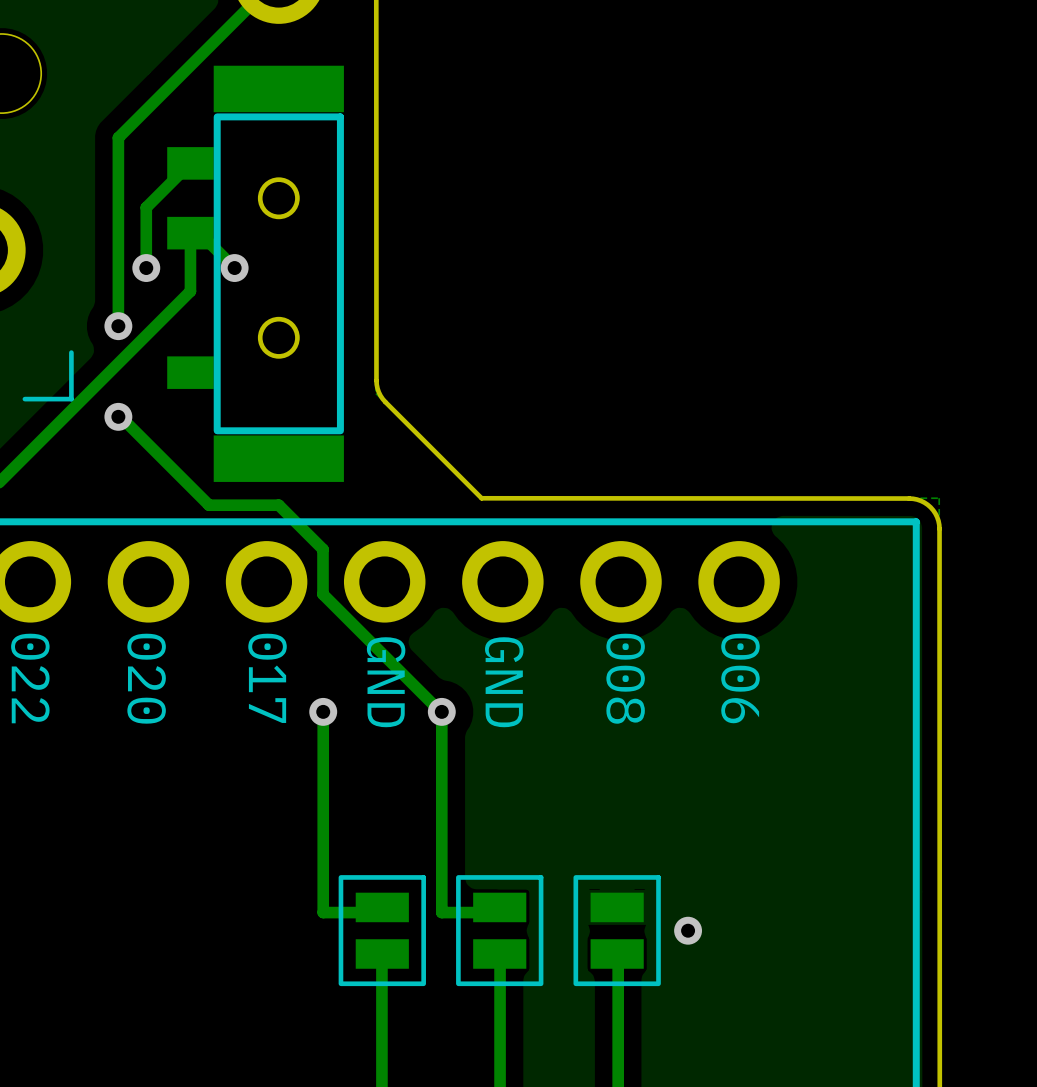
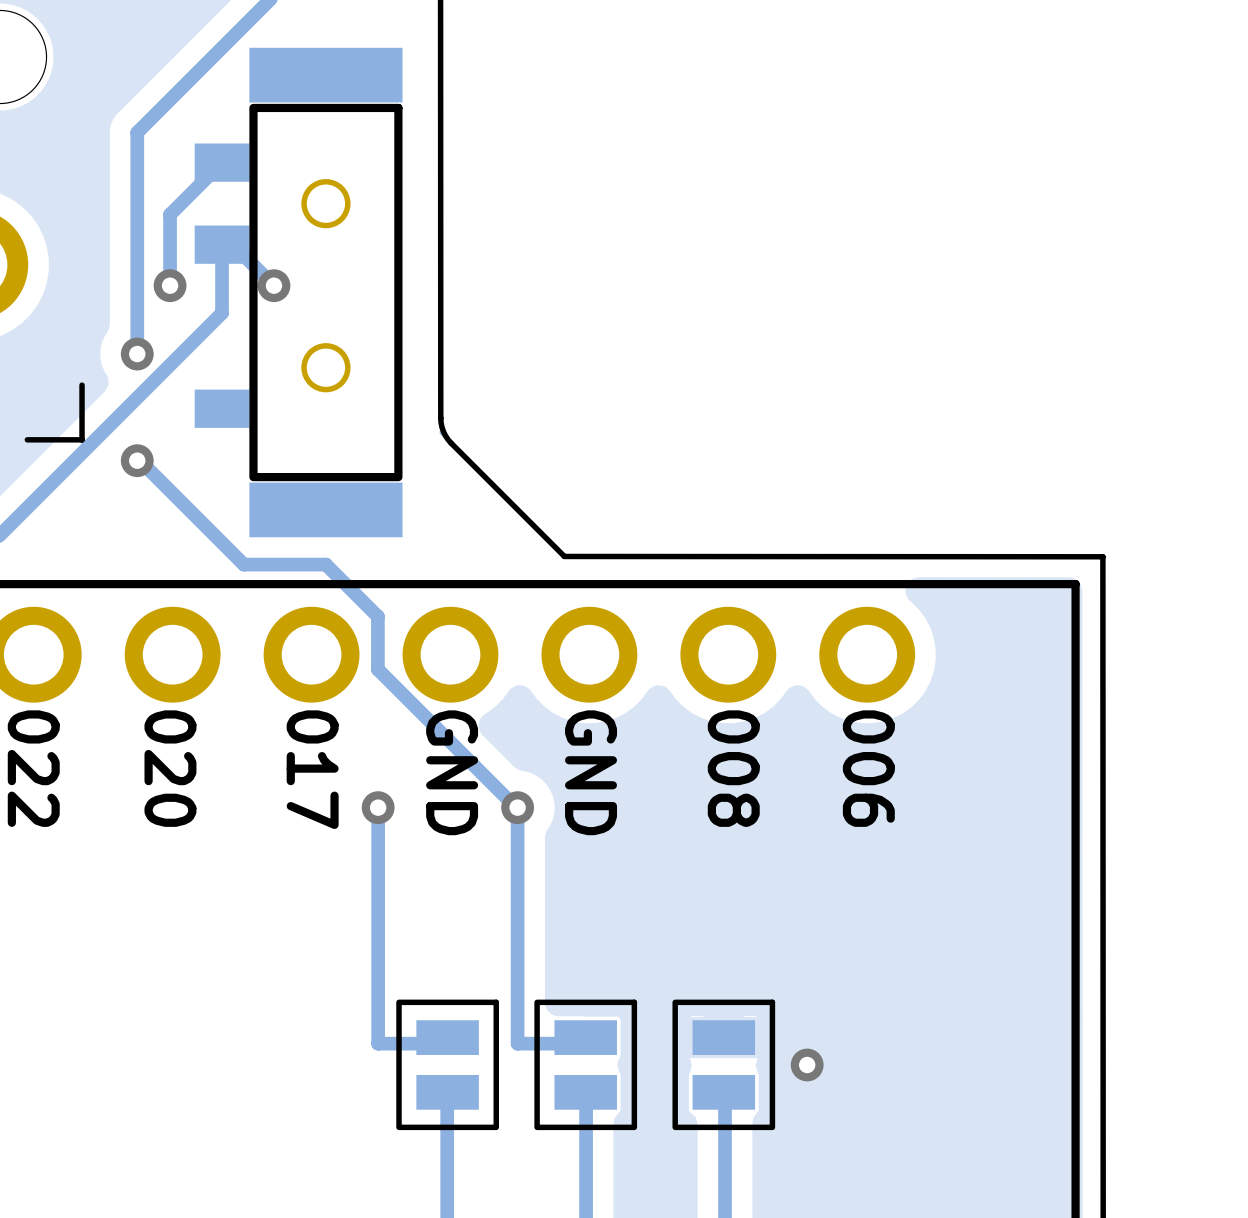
board edge: (909, 498) (920, 500) (930, 507) (937, 517) (939, 528) -> (1067, 556) (1102, 556) (1102, 592)

